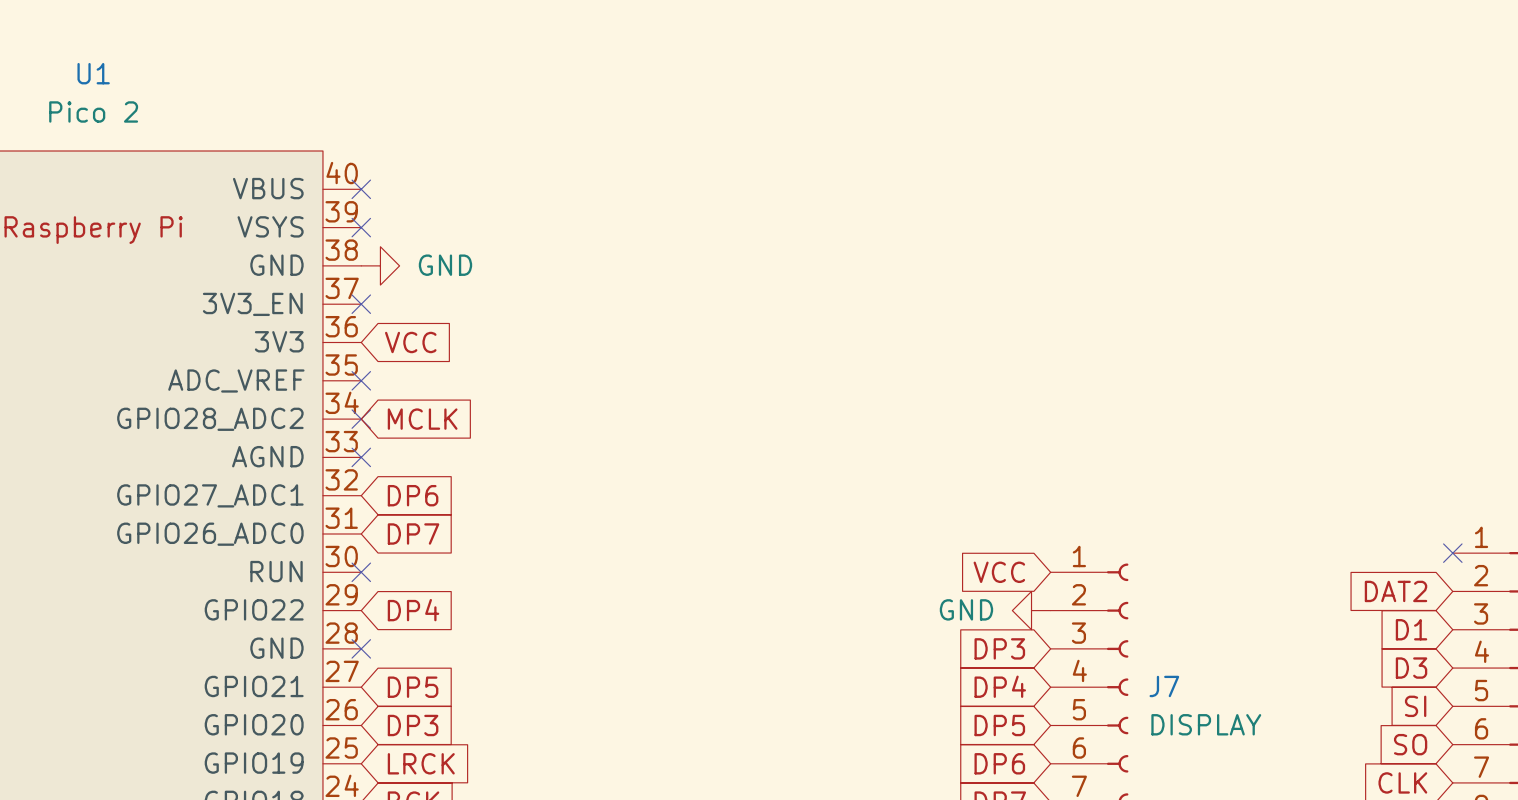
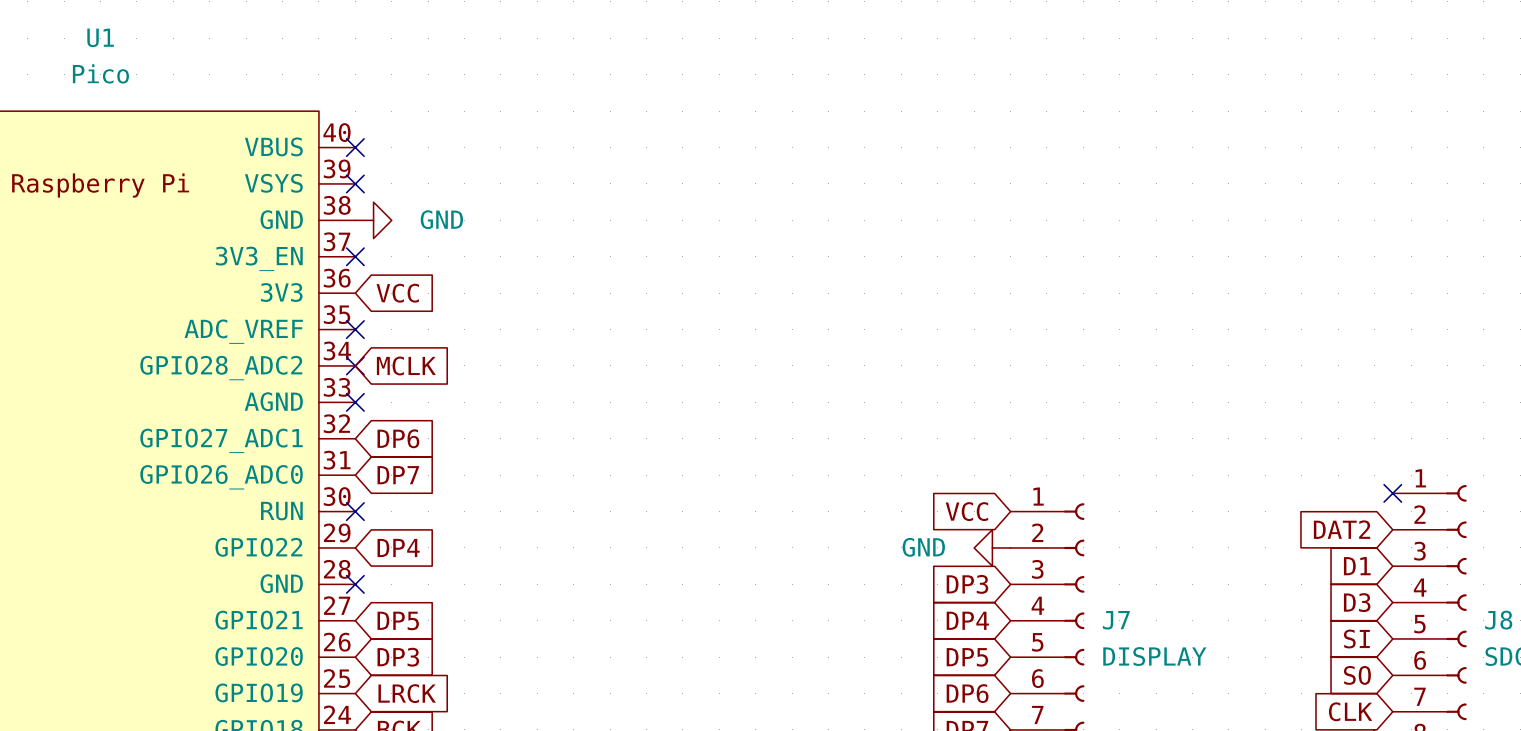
U1 value: Pico 2 (93, 111) -> Pico (100, 73)

